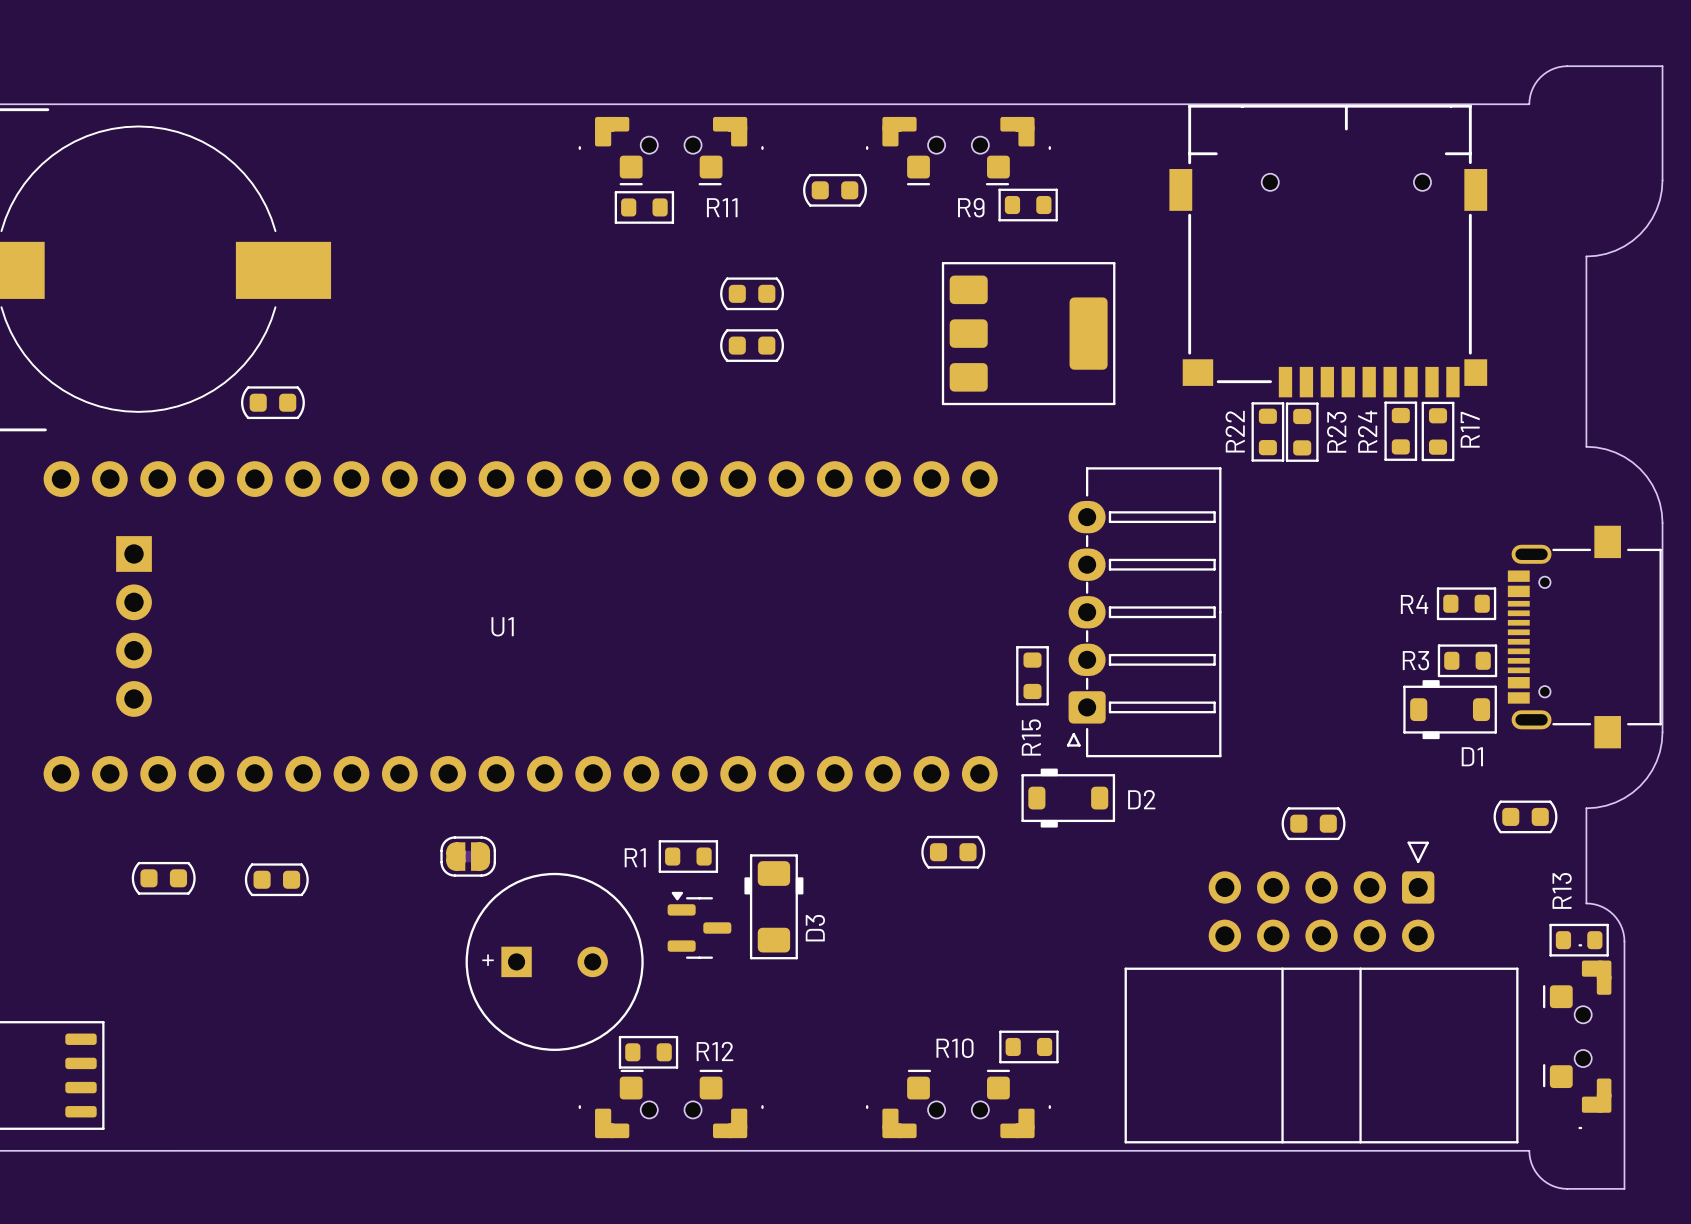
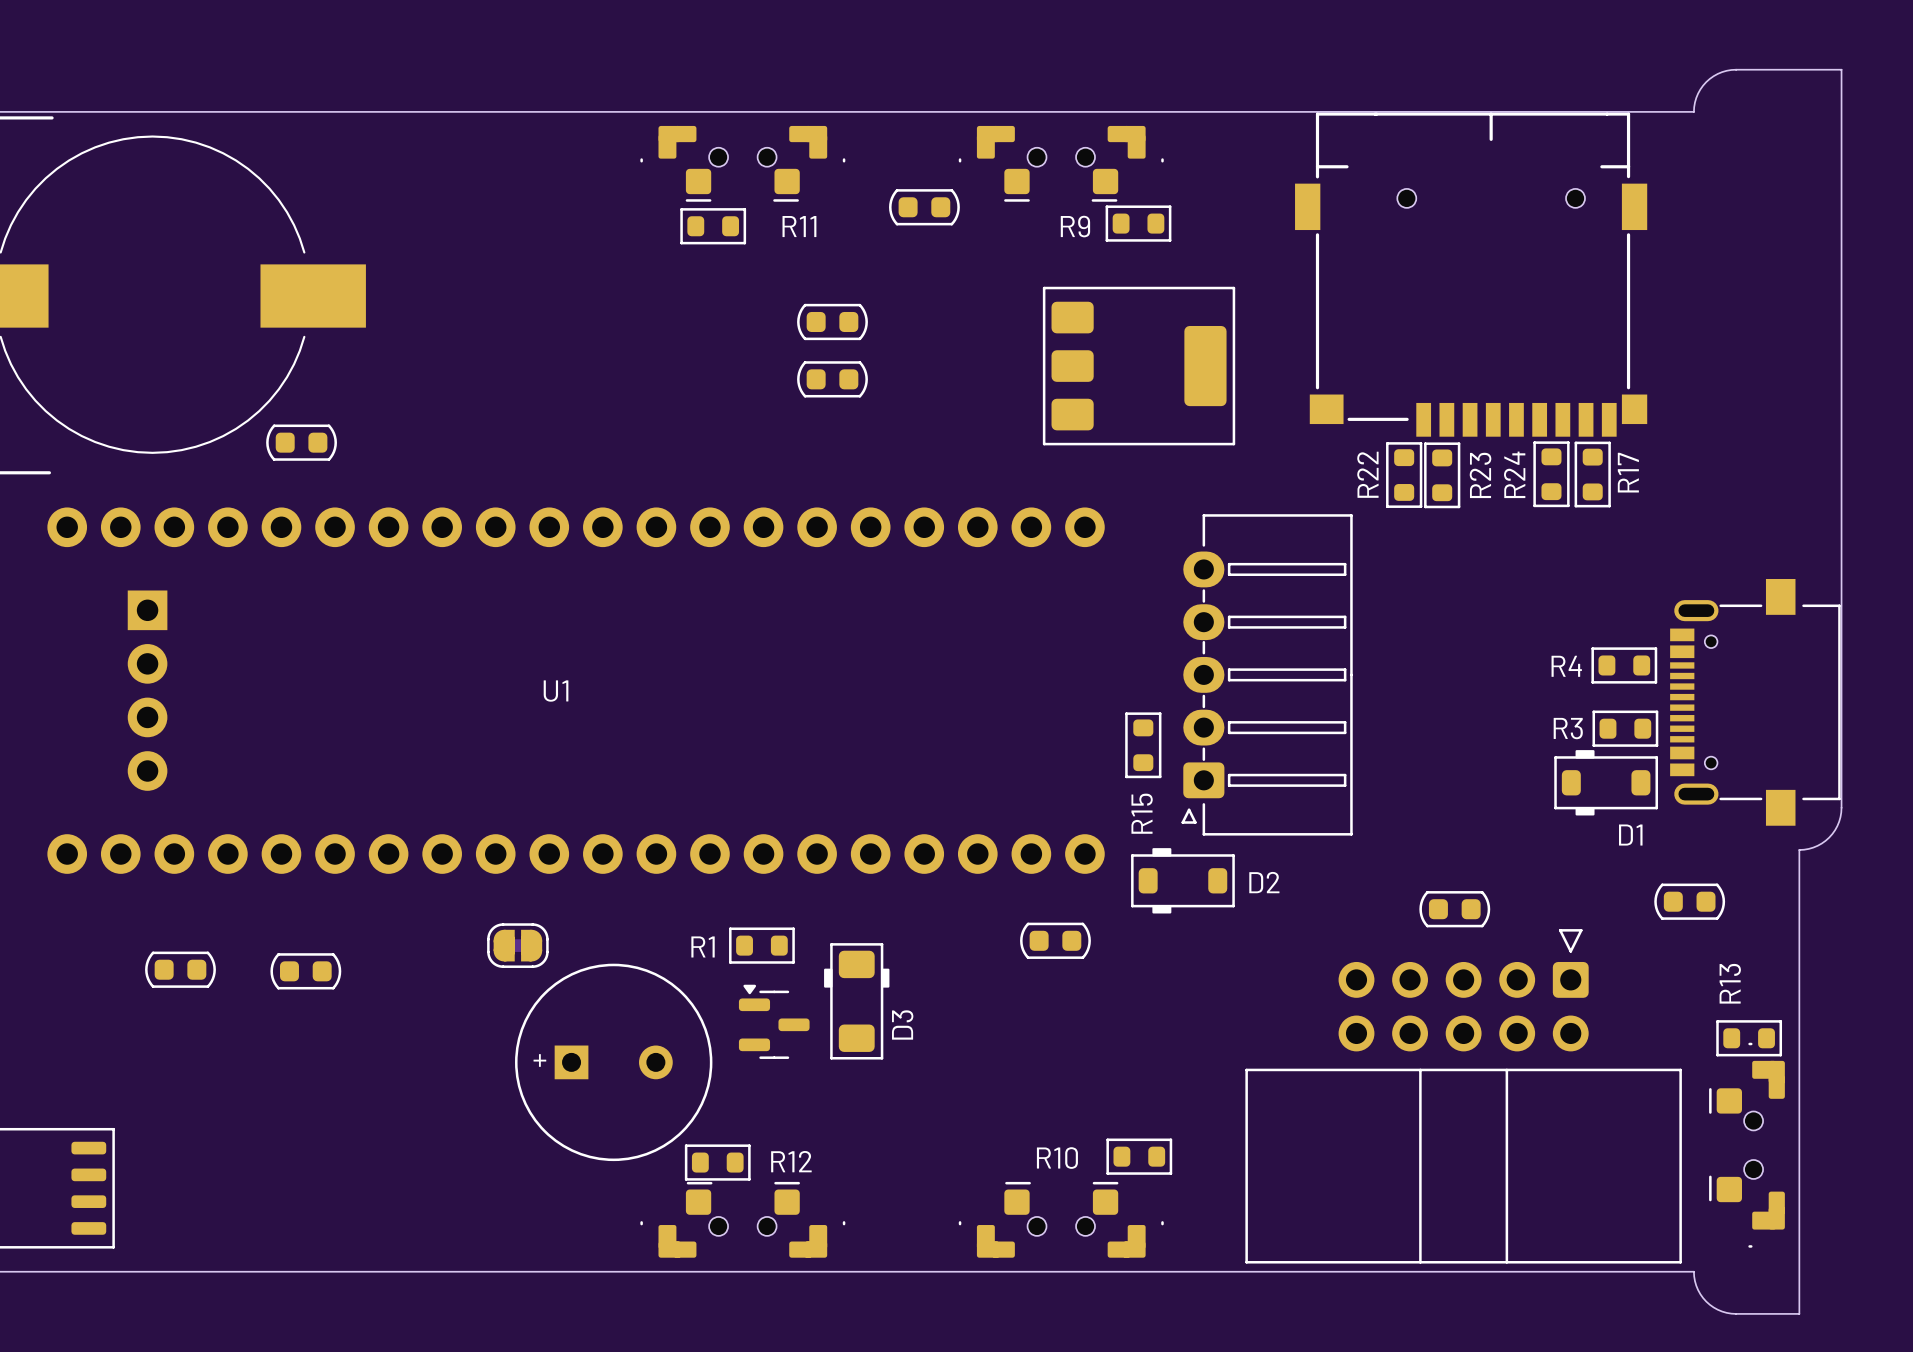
board edge: (1662, 180) (1656, 209) (1640, 234) (1615, 250) (1586, 256) (1586, 446) (1615, 452) (1640, 469) (1656, 493) (1662, 522) -> (1841, 196) (1841, 575)
board edge: (1662, 732) (1656, 761) (1640, 786) (1615, 802) (1586, 808) (1586, 903) (1602, 907) (1613, 914) (1620, 925) (1624, 941) -> (1841, 807) (1839, 821) (1829, 837) (1817, 845) (1799, 849) (1799, 1039)

